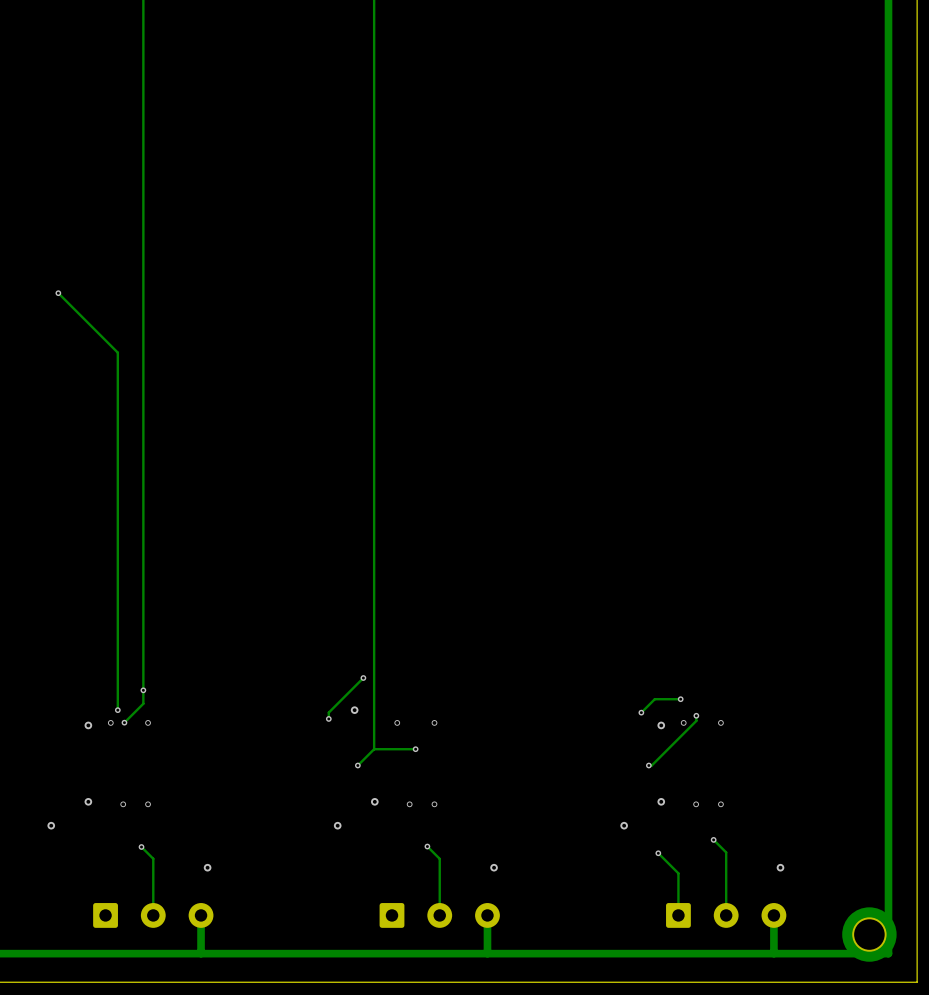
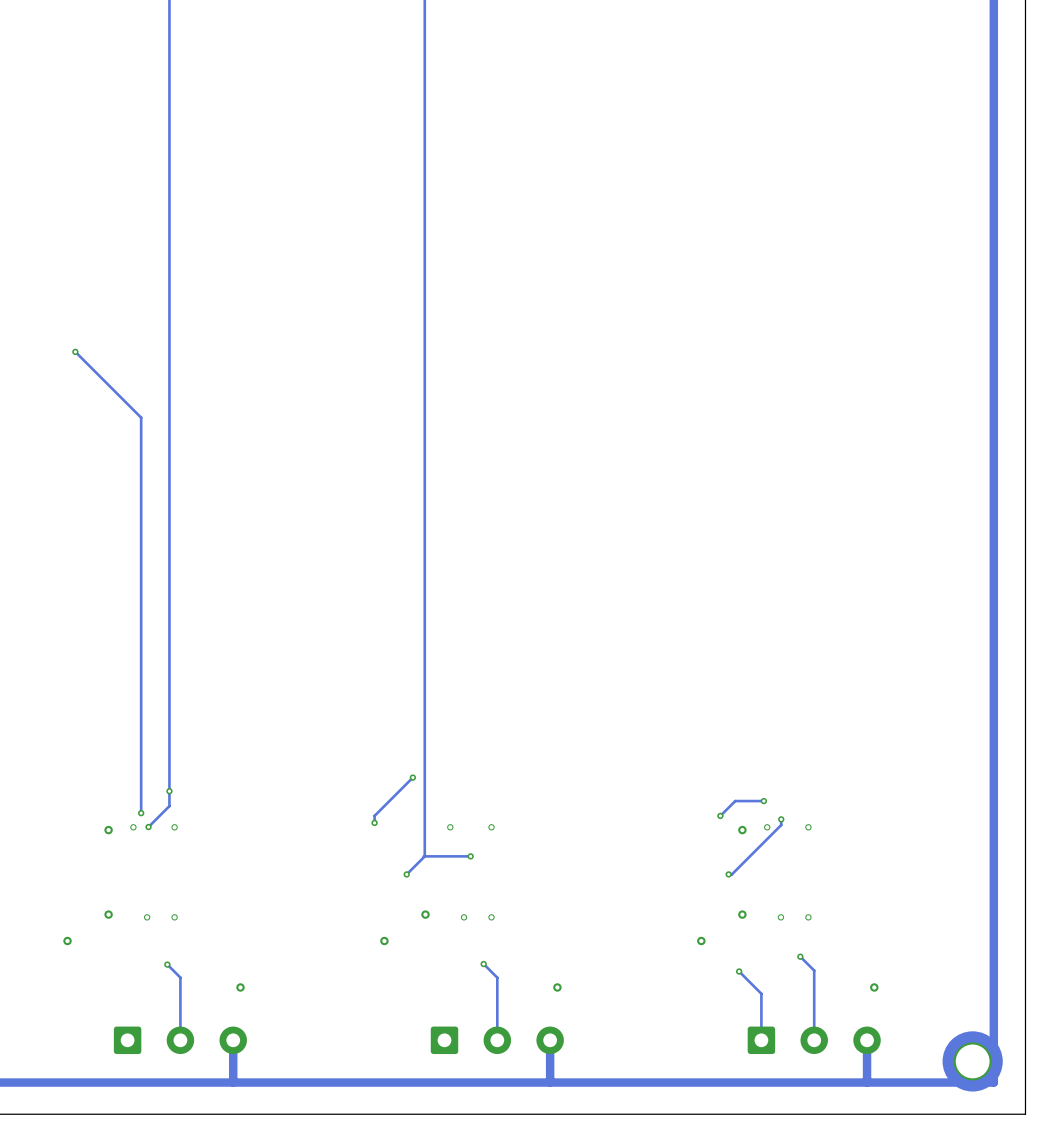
via: (354, 710) -> none

